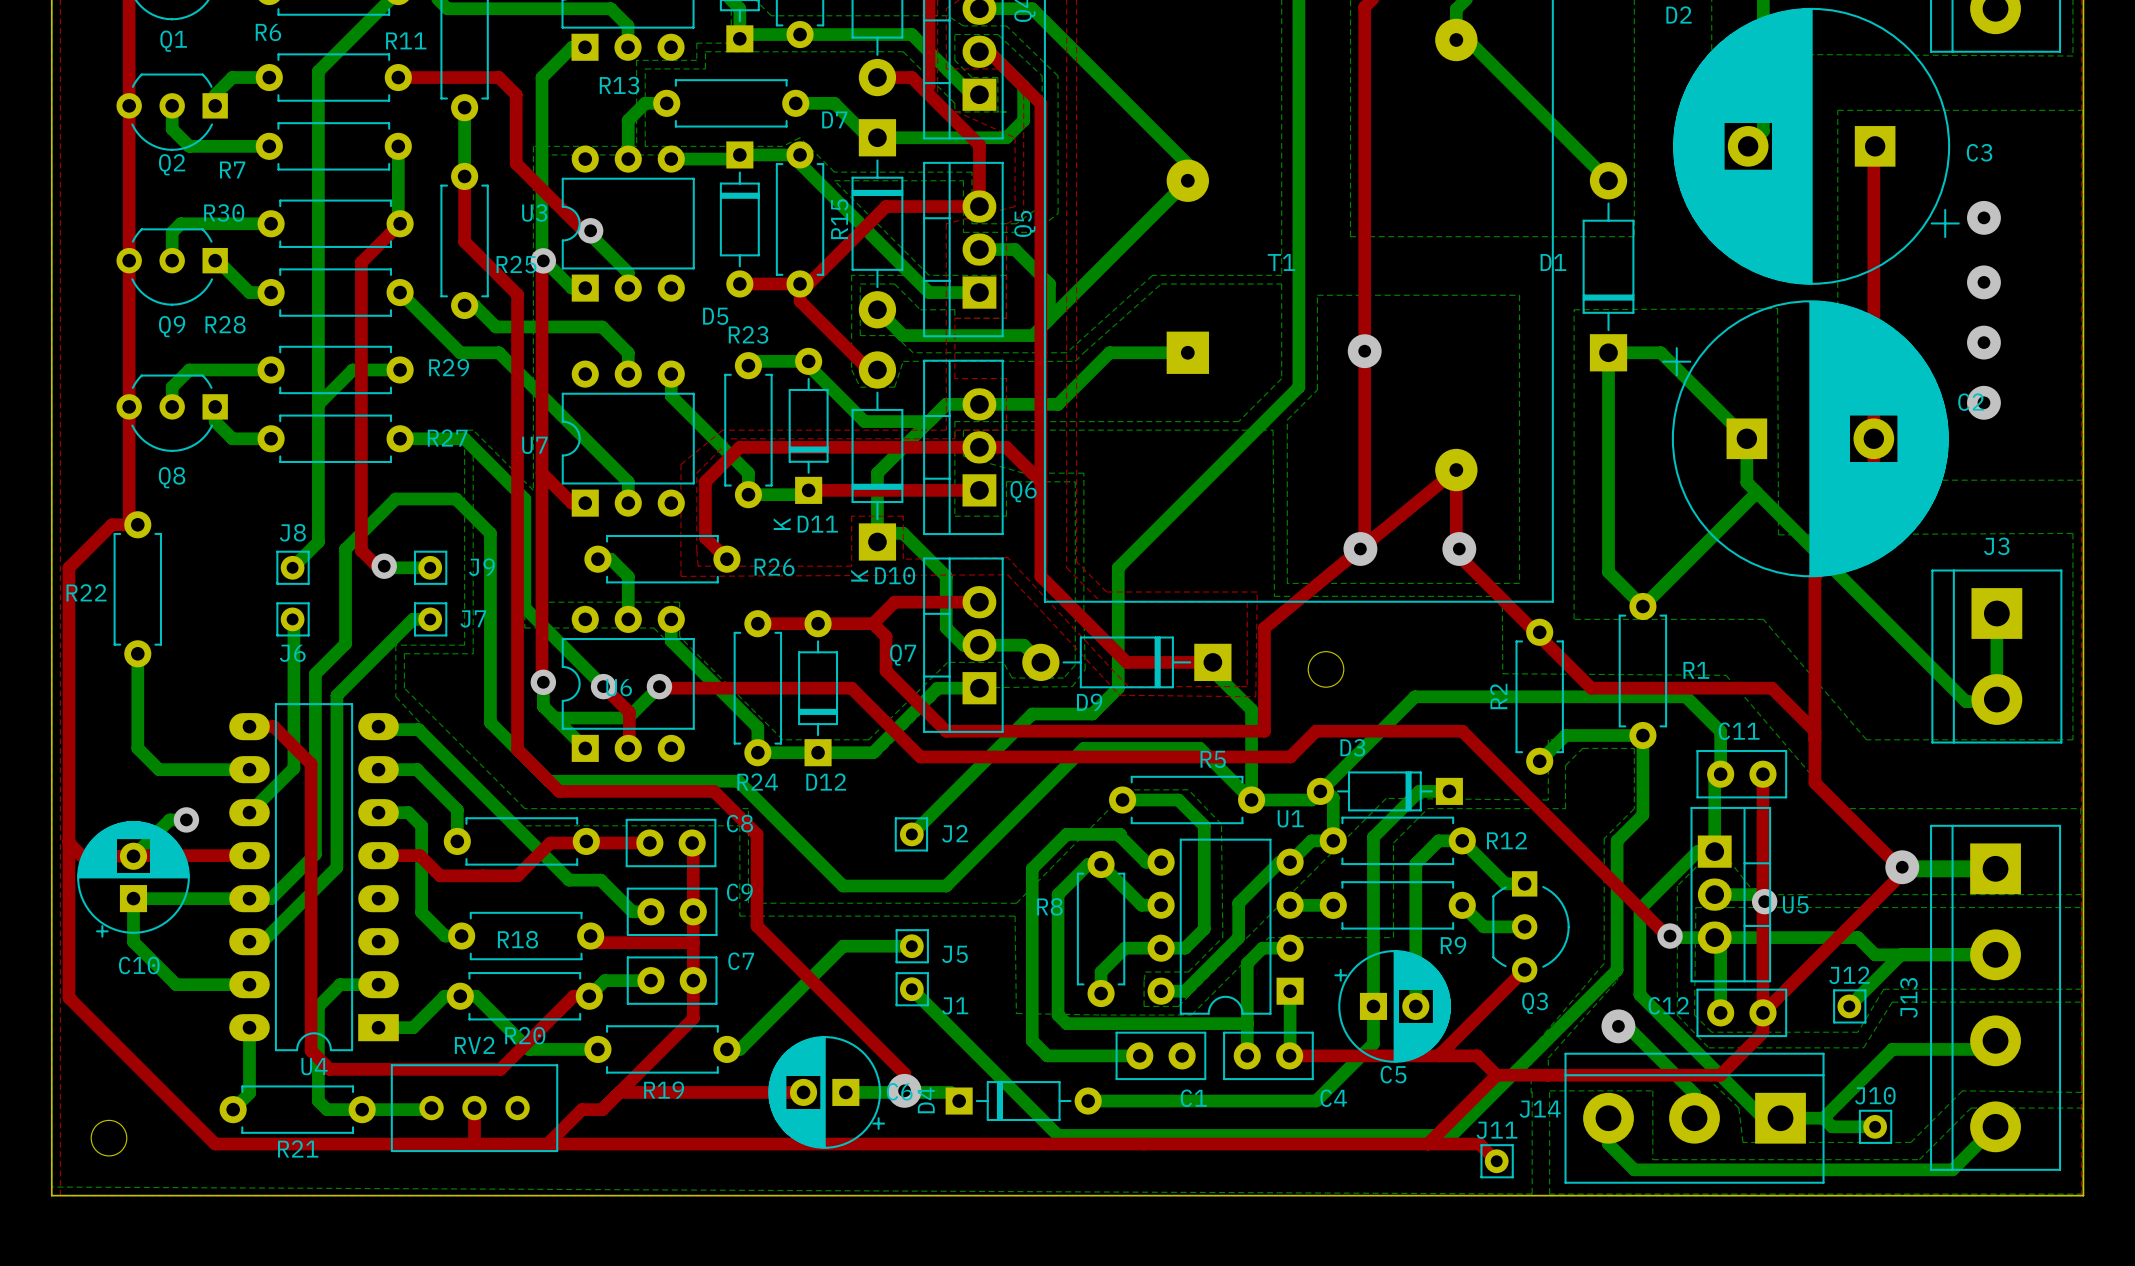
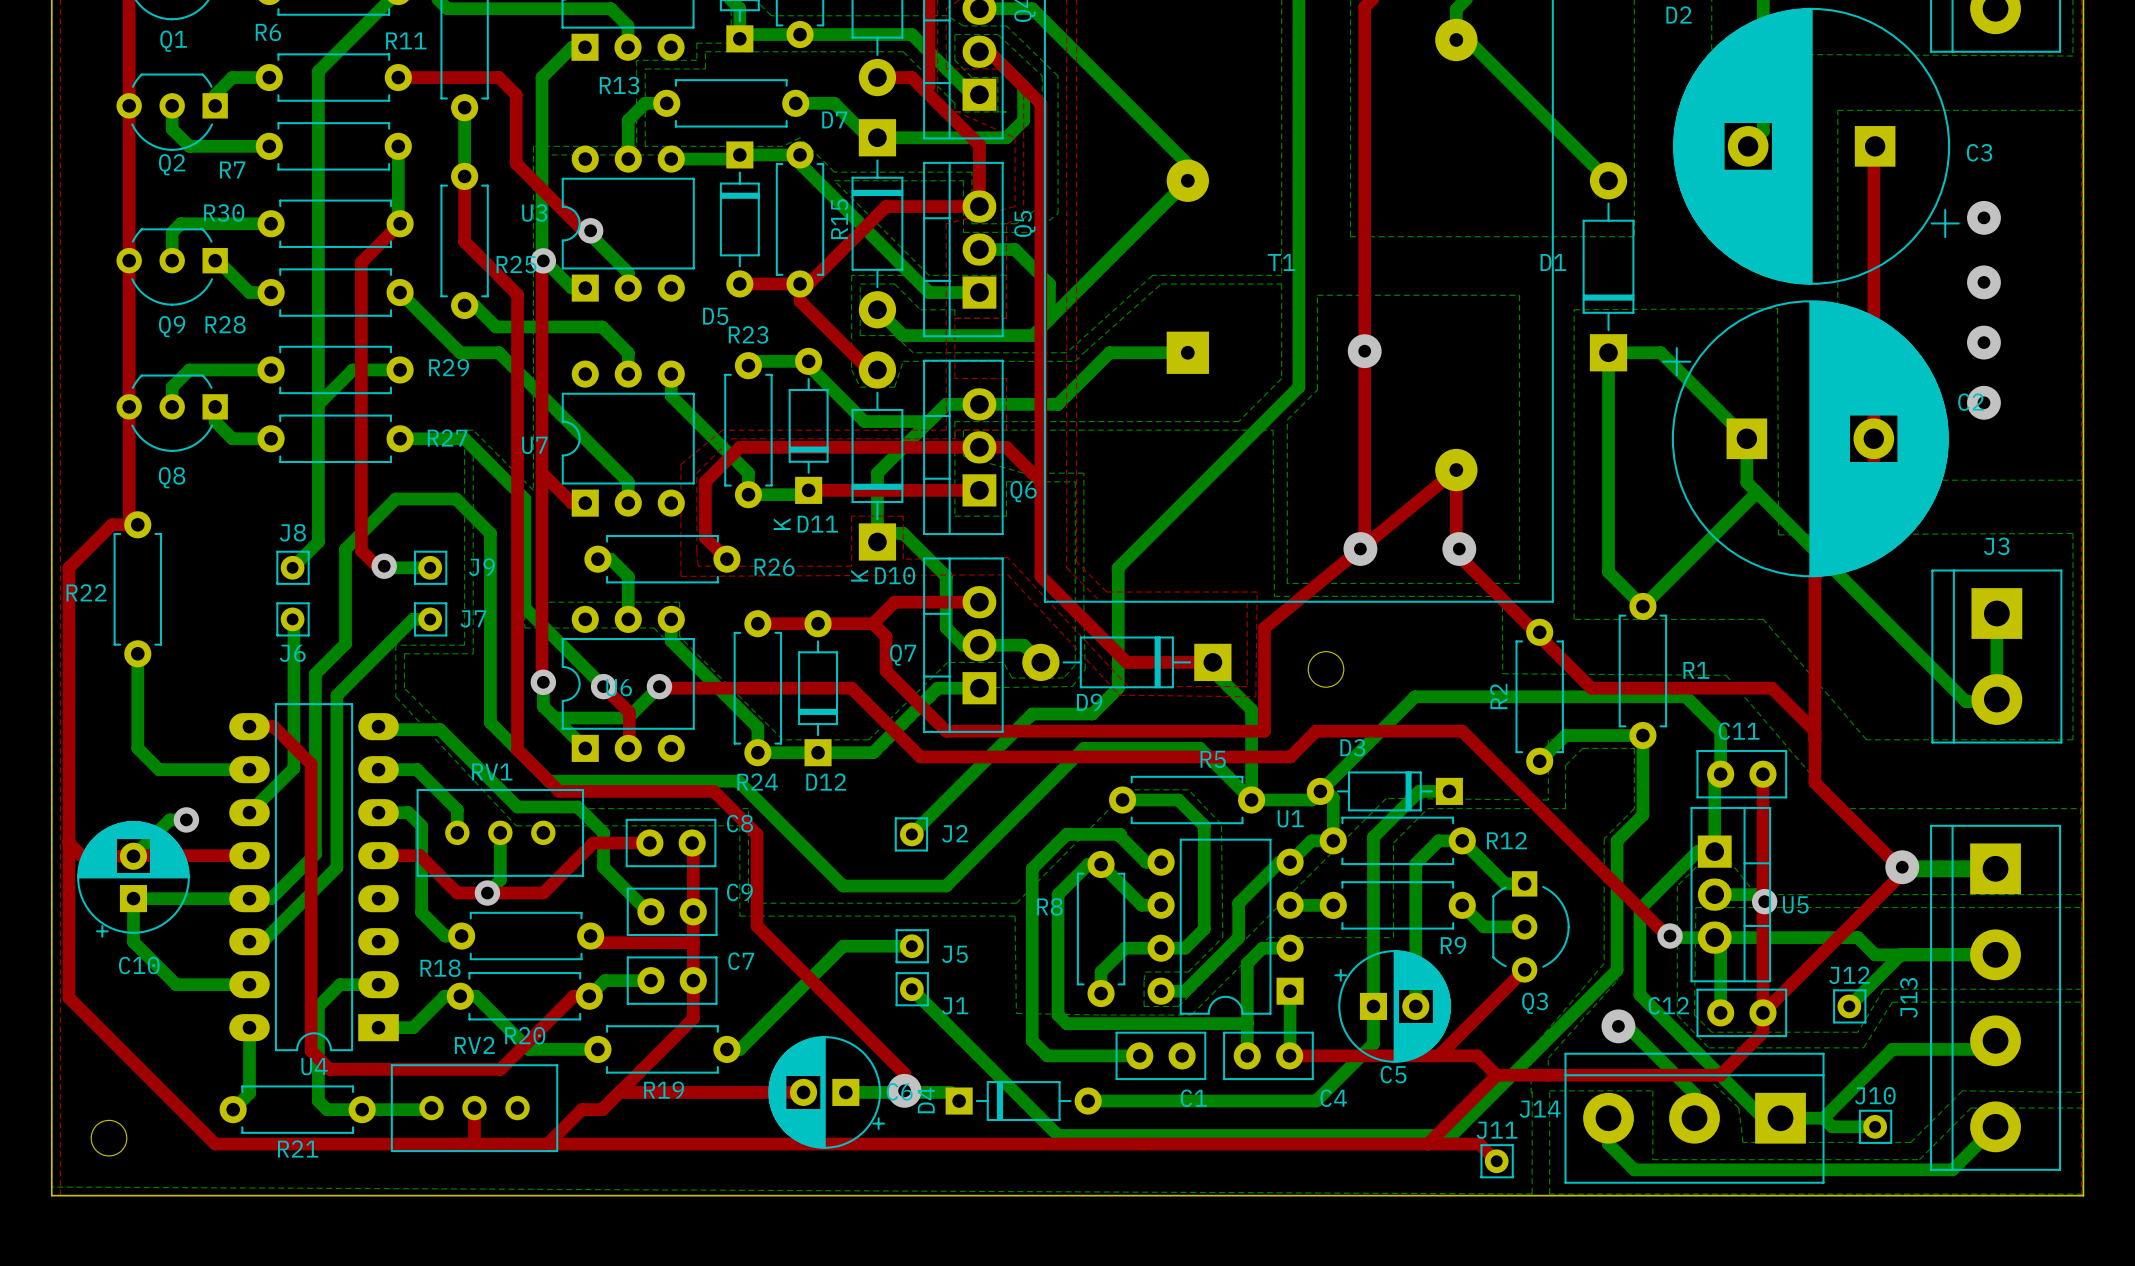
bottom track: (418, 729) (569, 880) (600, 880) (632, 911) (648, 911) -> (418, 729) (440, 729) (517, 807) (577, 807) (603, 832) (603, 867) (648, 911)
bottom track: none -> (500, 832) (500, 880) (487, 893)
RV1: none -> (500, 832)
part: (521, 841) -> none
top track: (593, 843) (550, 843) (517, 875) (440, 875) -> (593, 843) (543, 893) (457, 893) (440, 875)
via: none -> (487, 893)
R18 name position: R18 (517, 939) -> R18 (440, 968)

